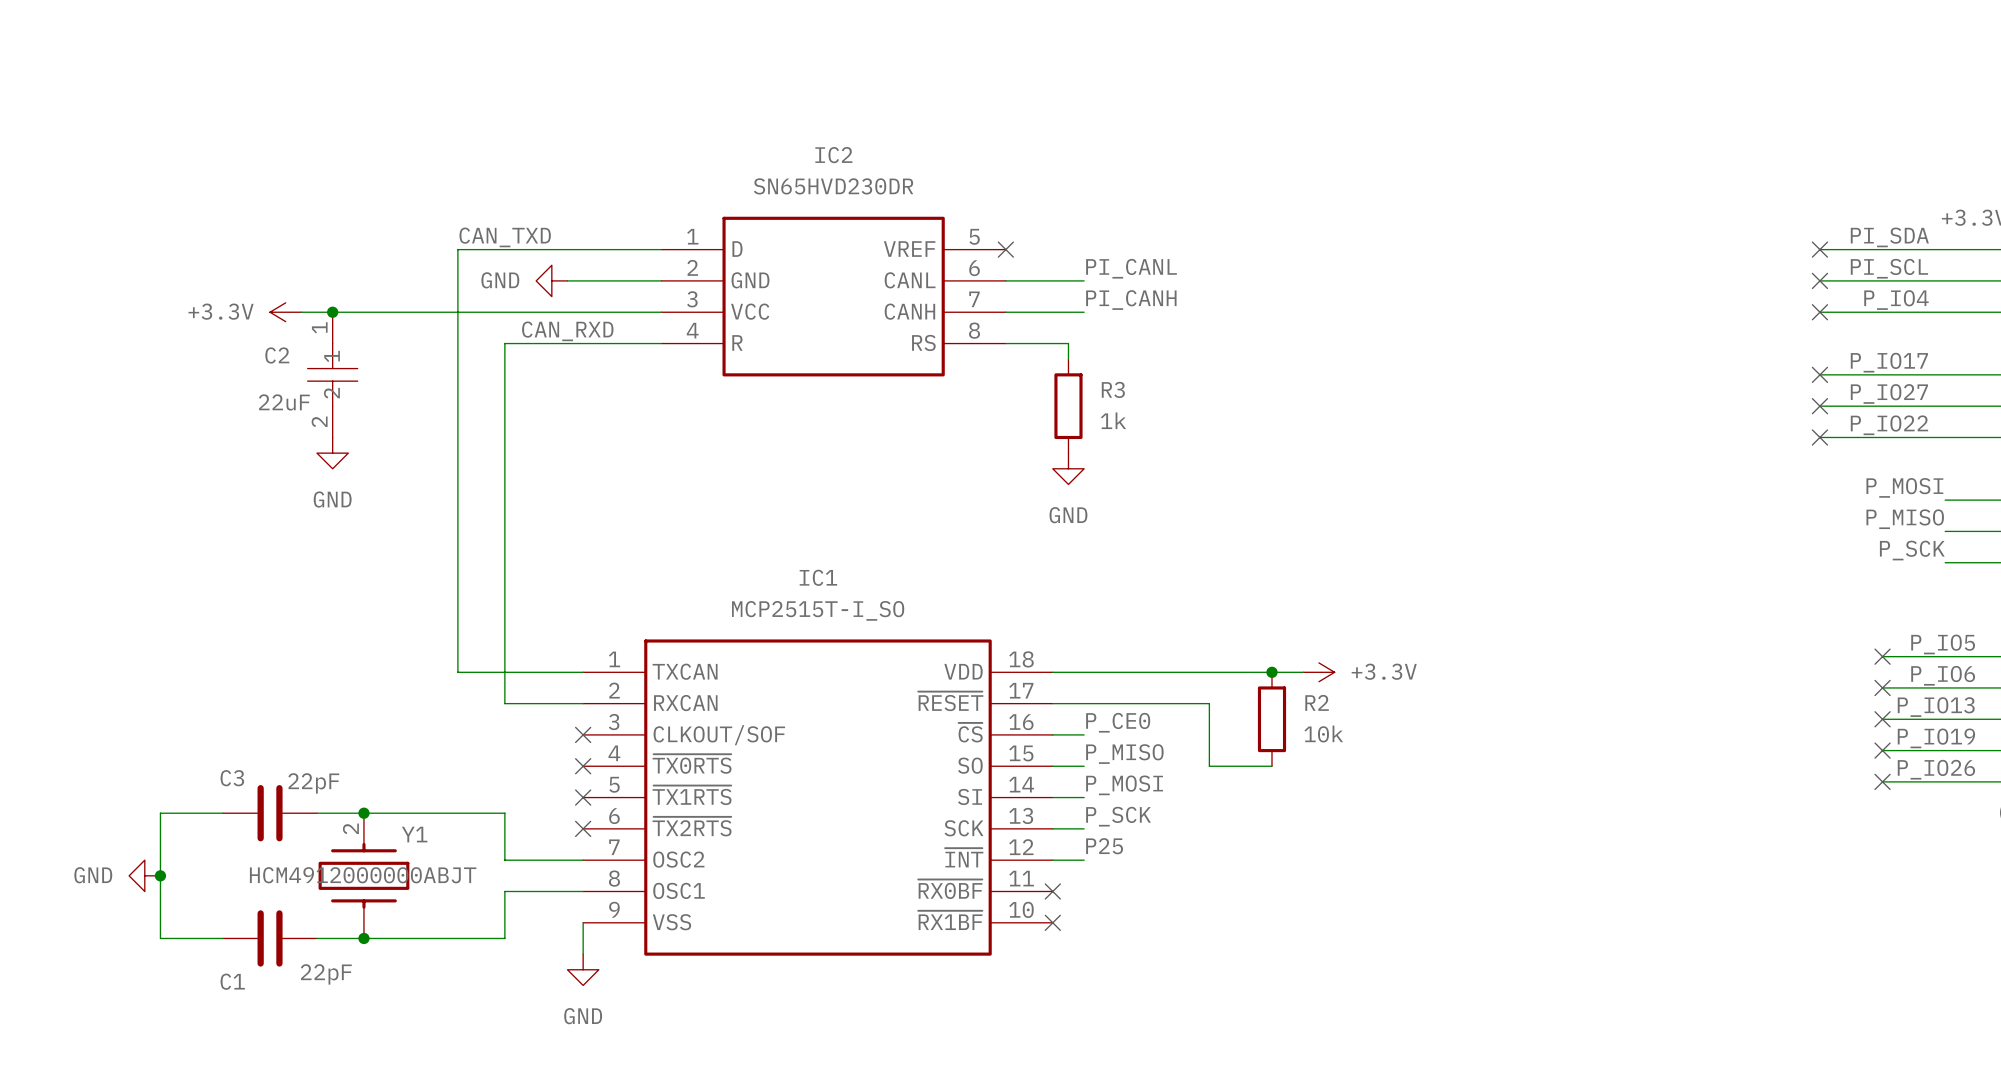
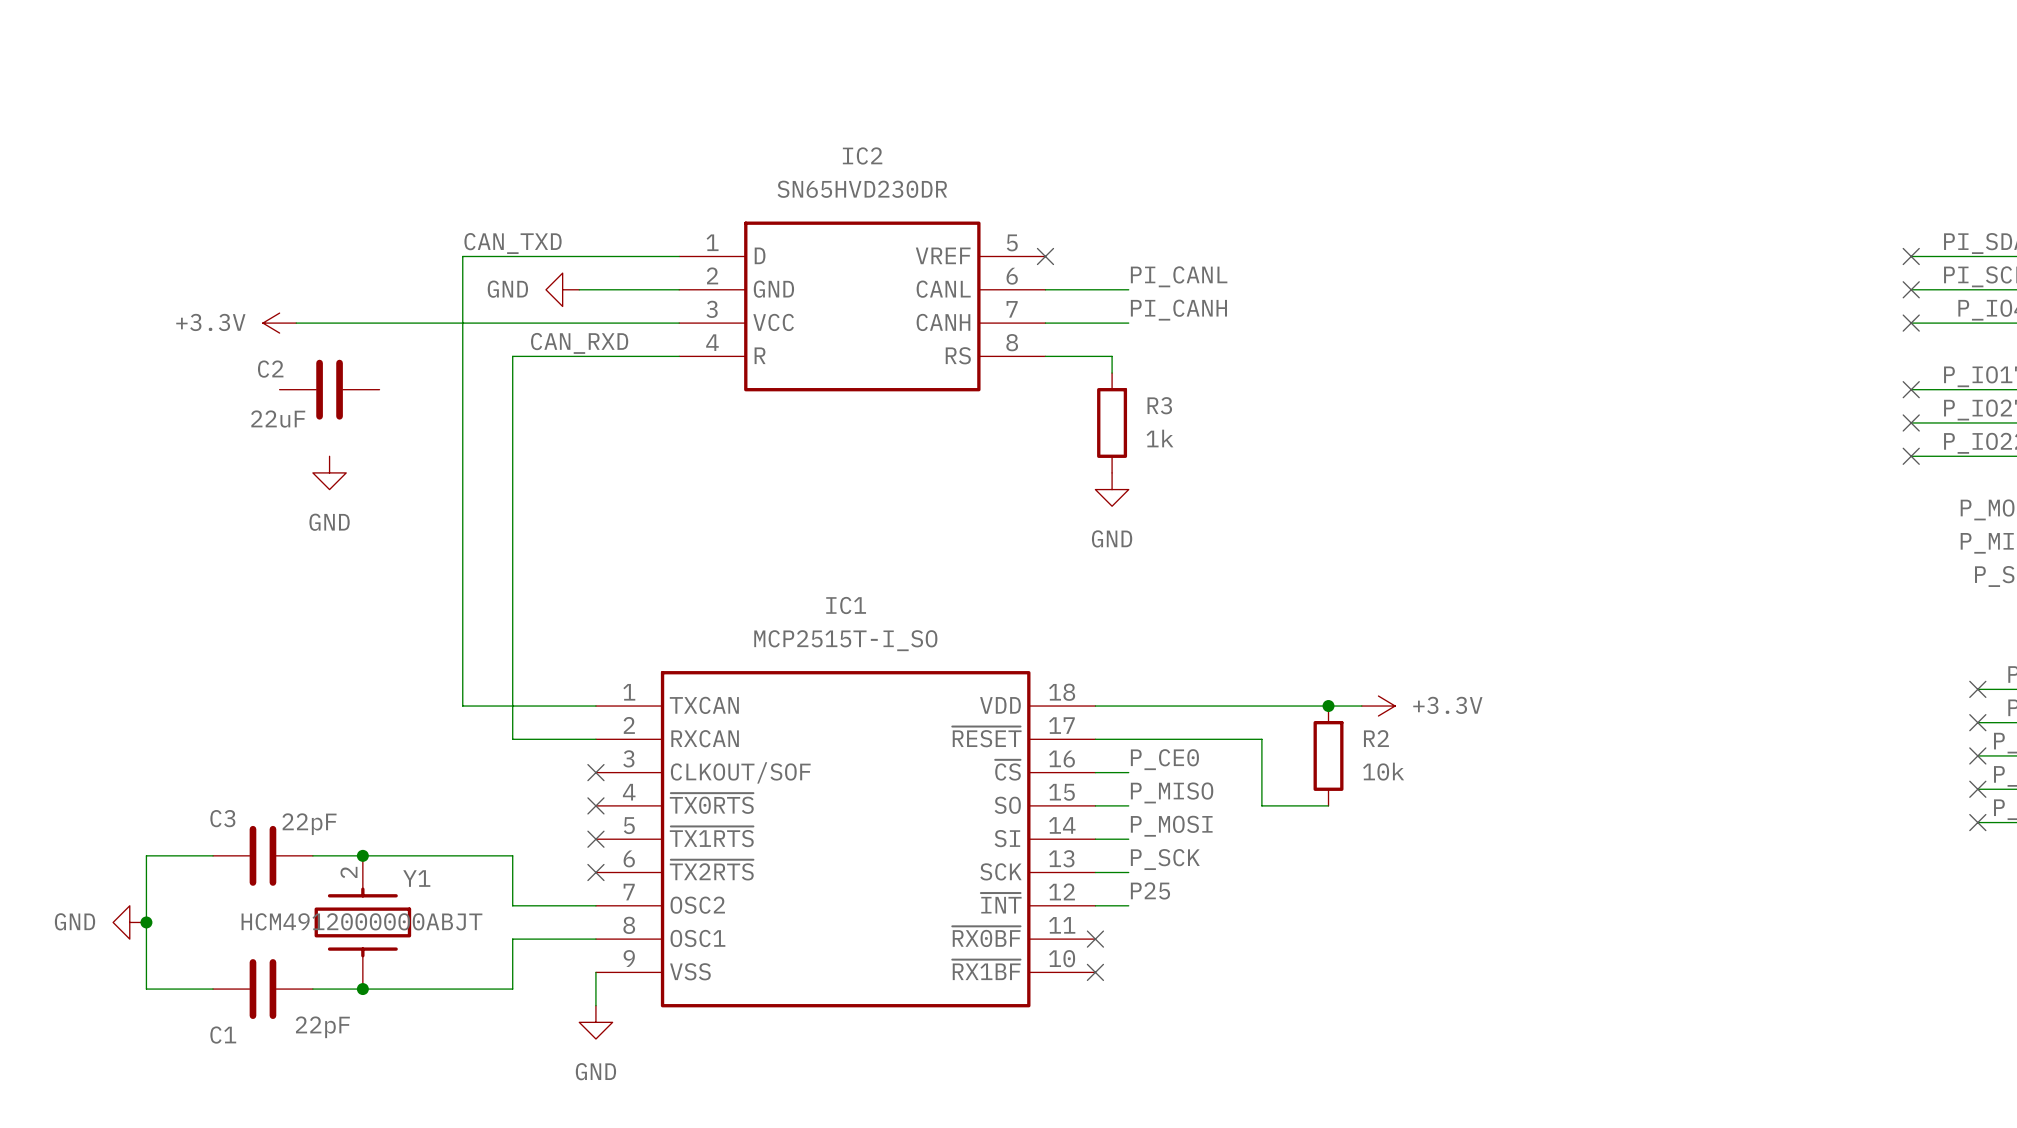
C2 symbol: [307, 312, 358, 438] -> [279, 359, 380, 420]
junction: (332, 312) -> none

